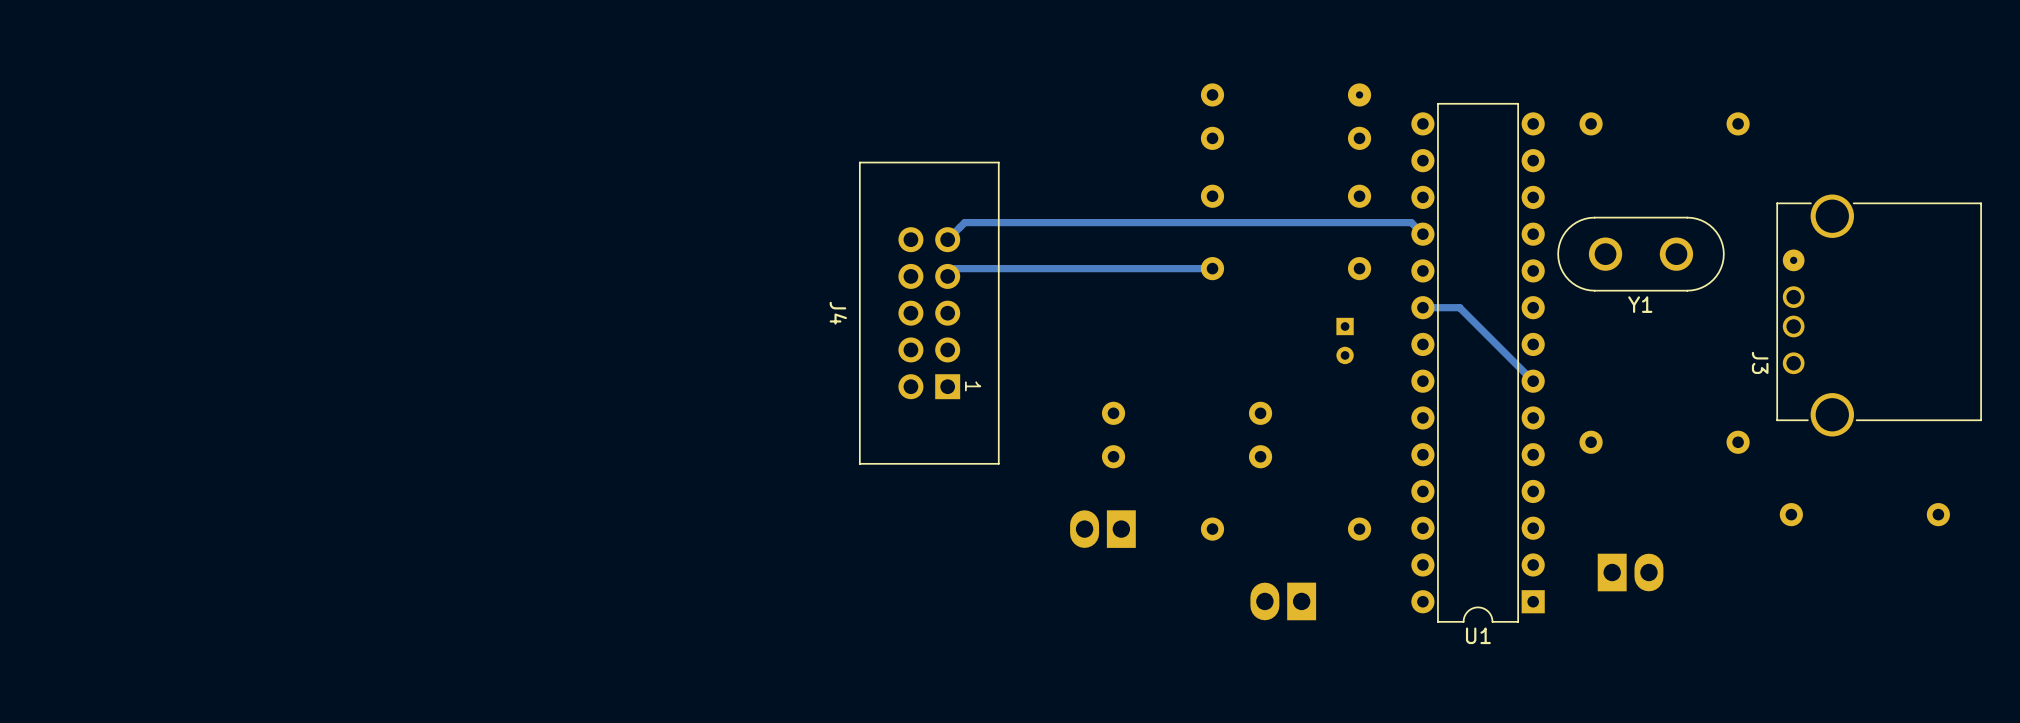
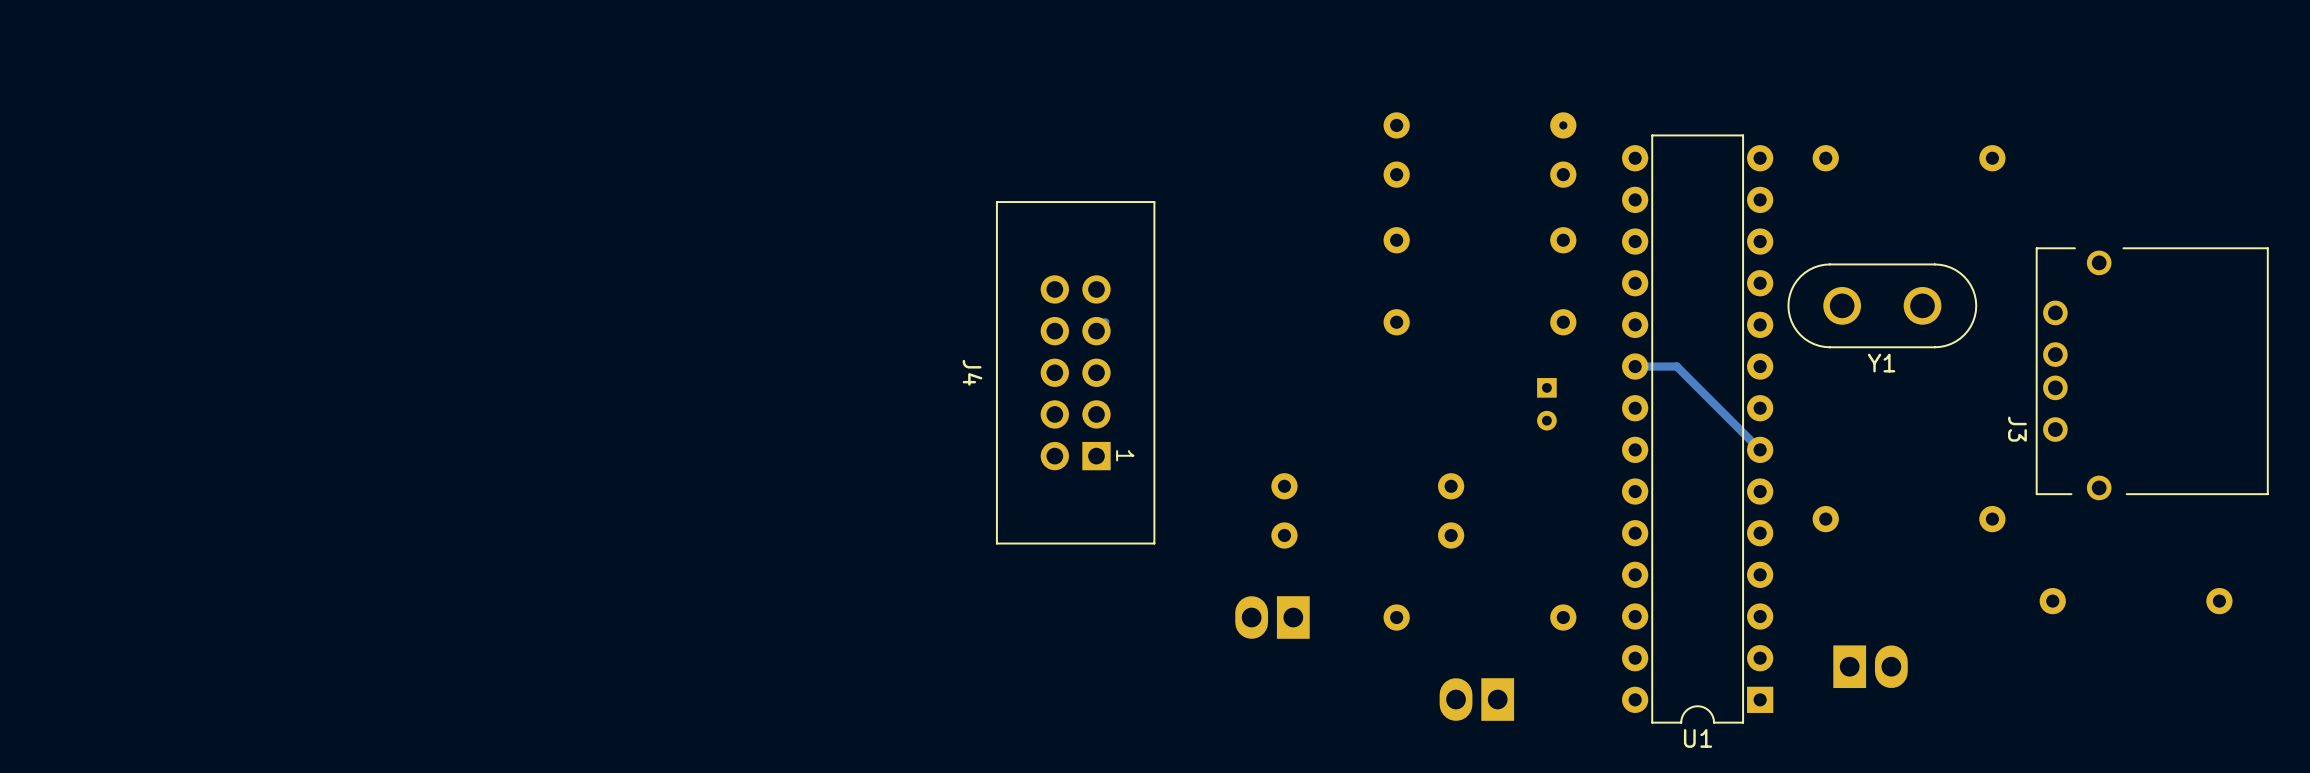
J3 footprint: [1776, 194, 1982, 437] -> [2035, 247, 2269, 501]
track: (1422, 234) (1411, 222) (964, 222) (947, 239) -> none
track: (1212, 268) (955, 268) -> none

